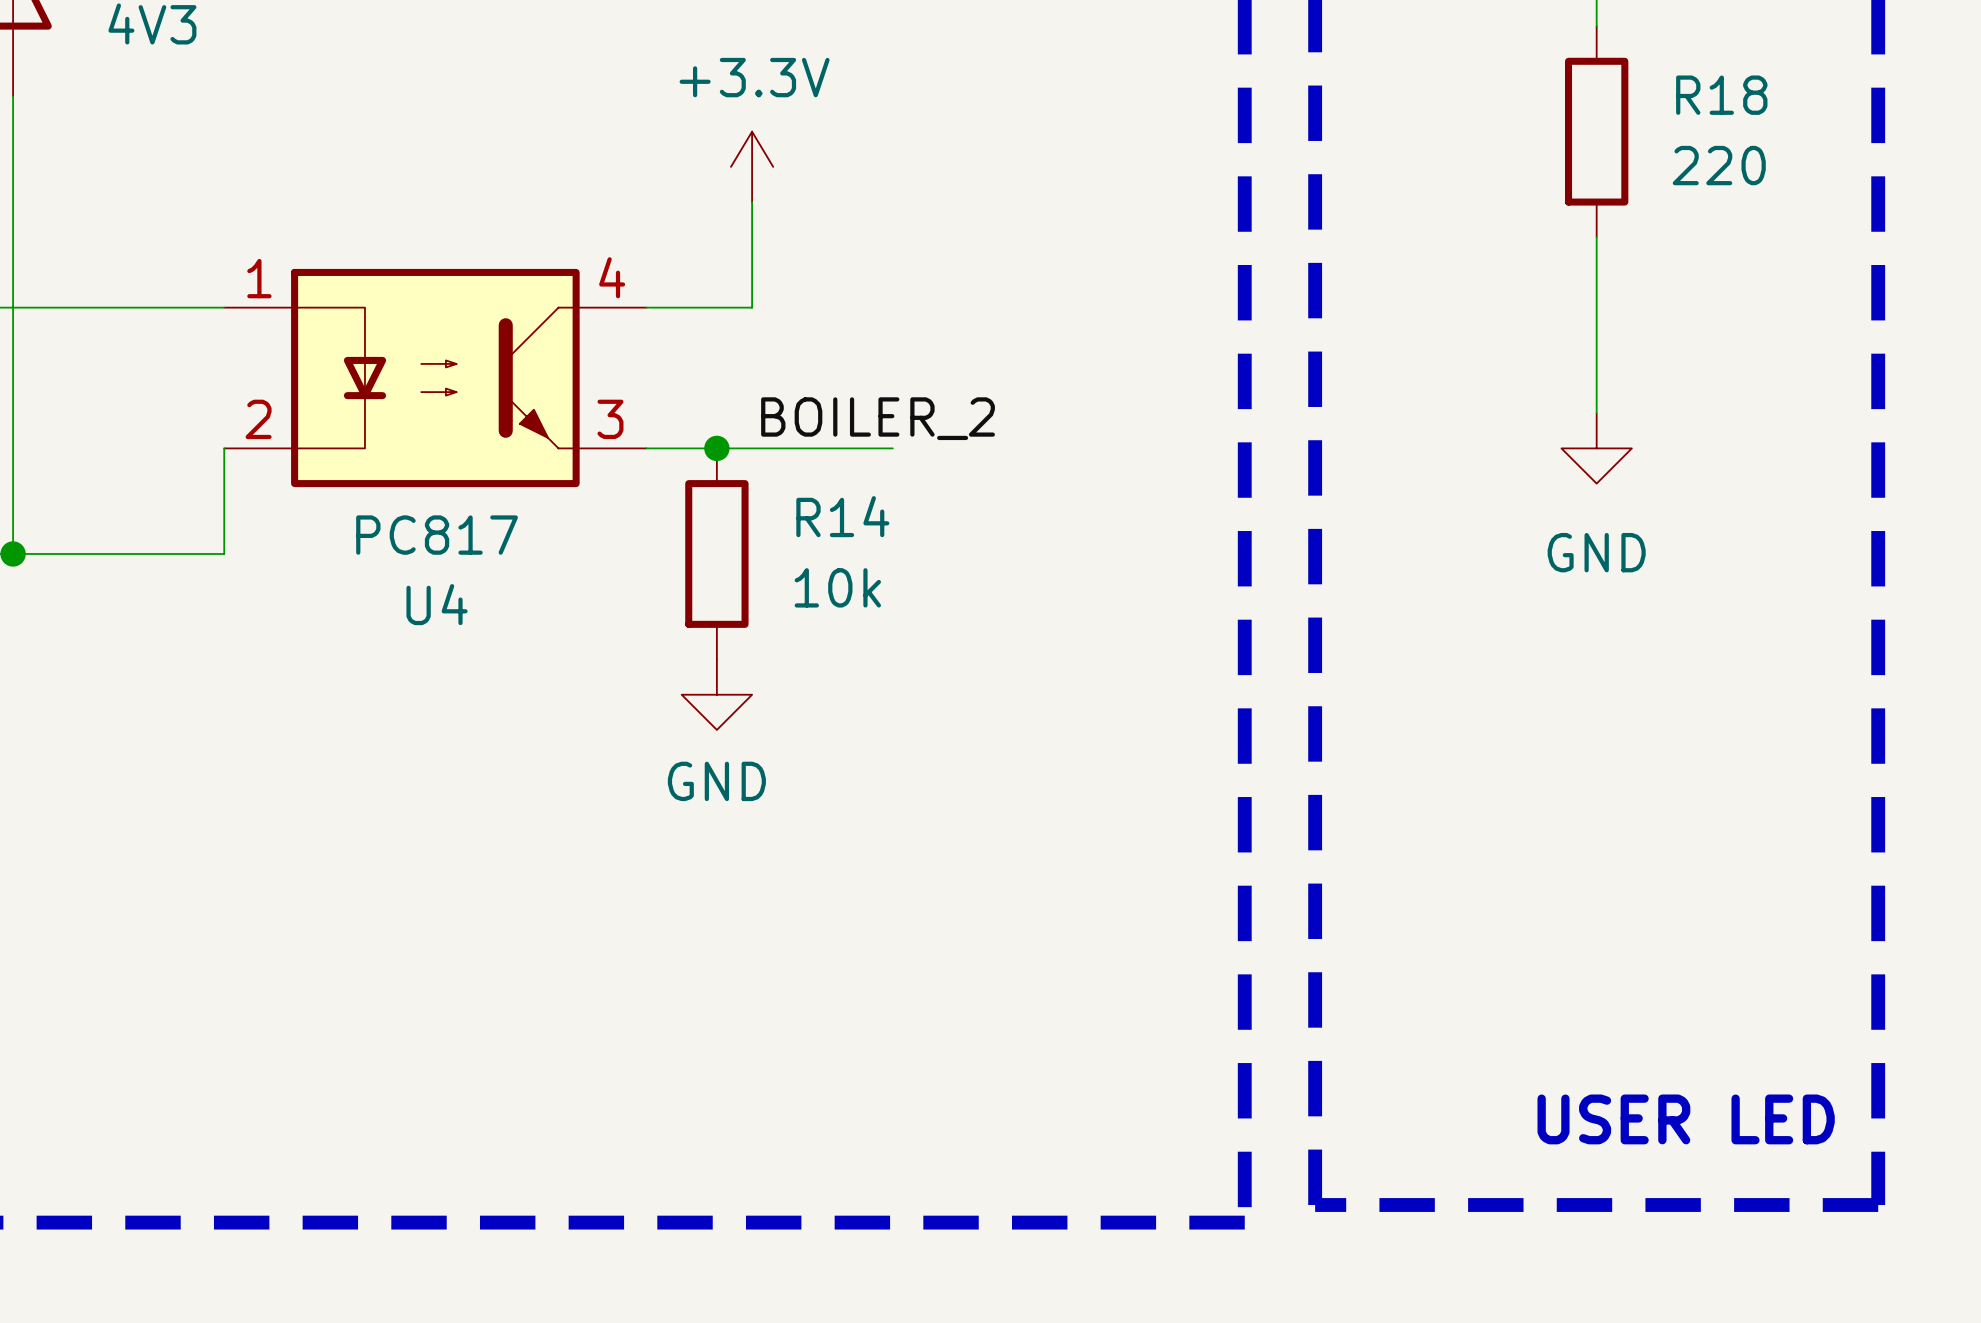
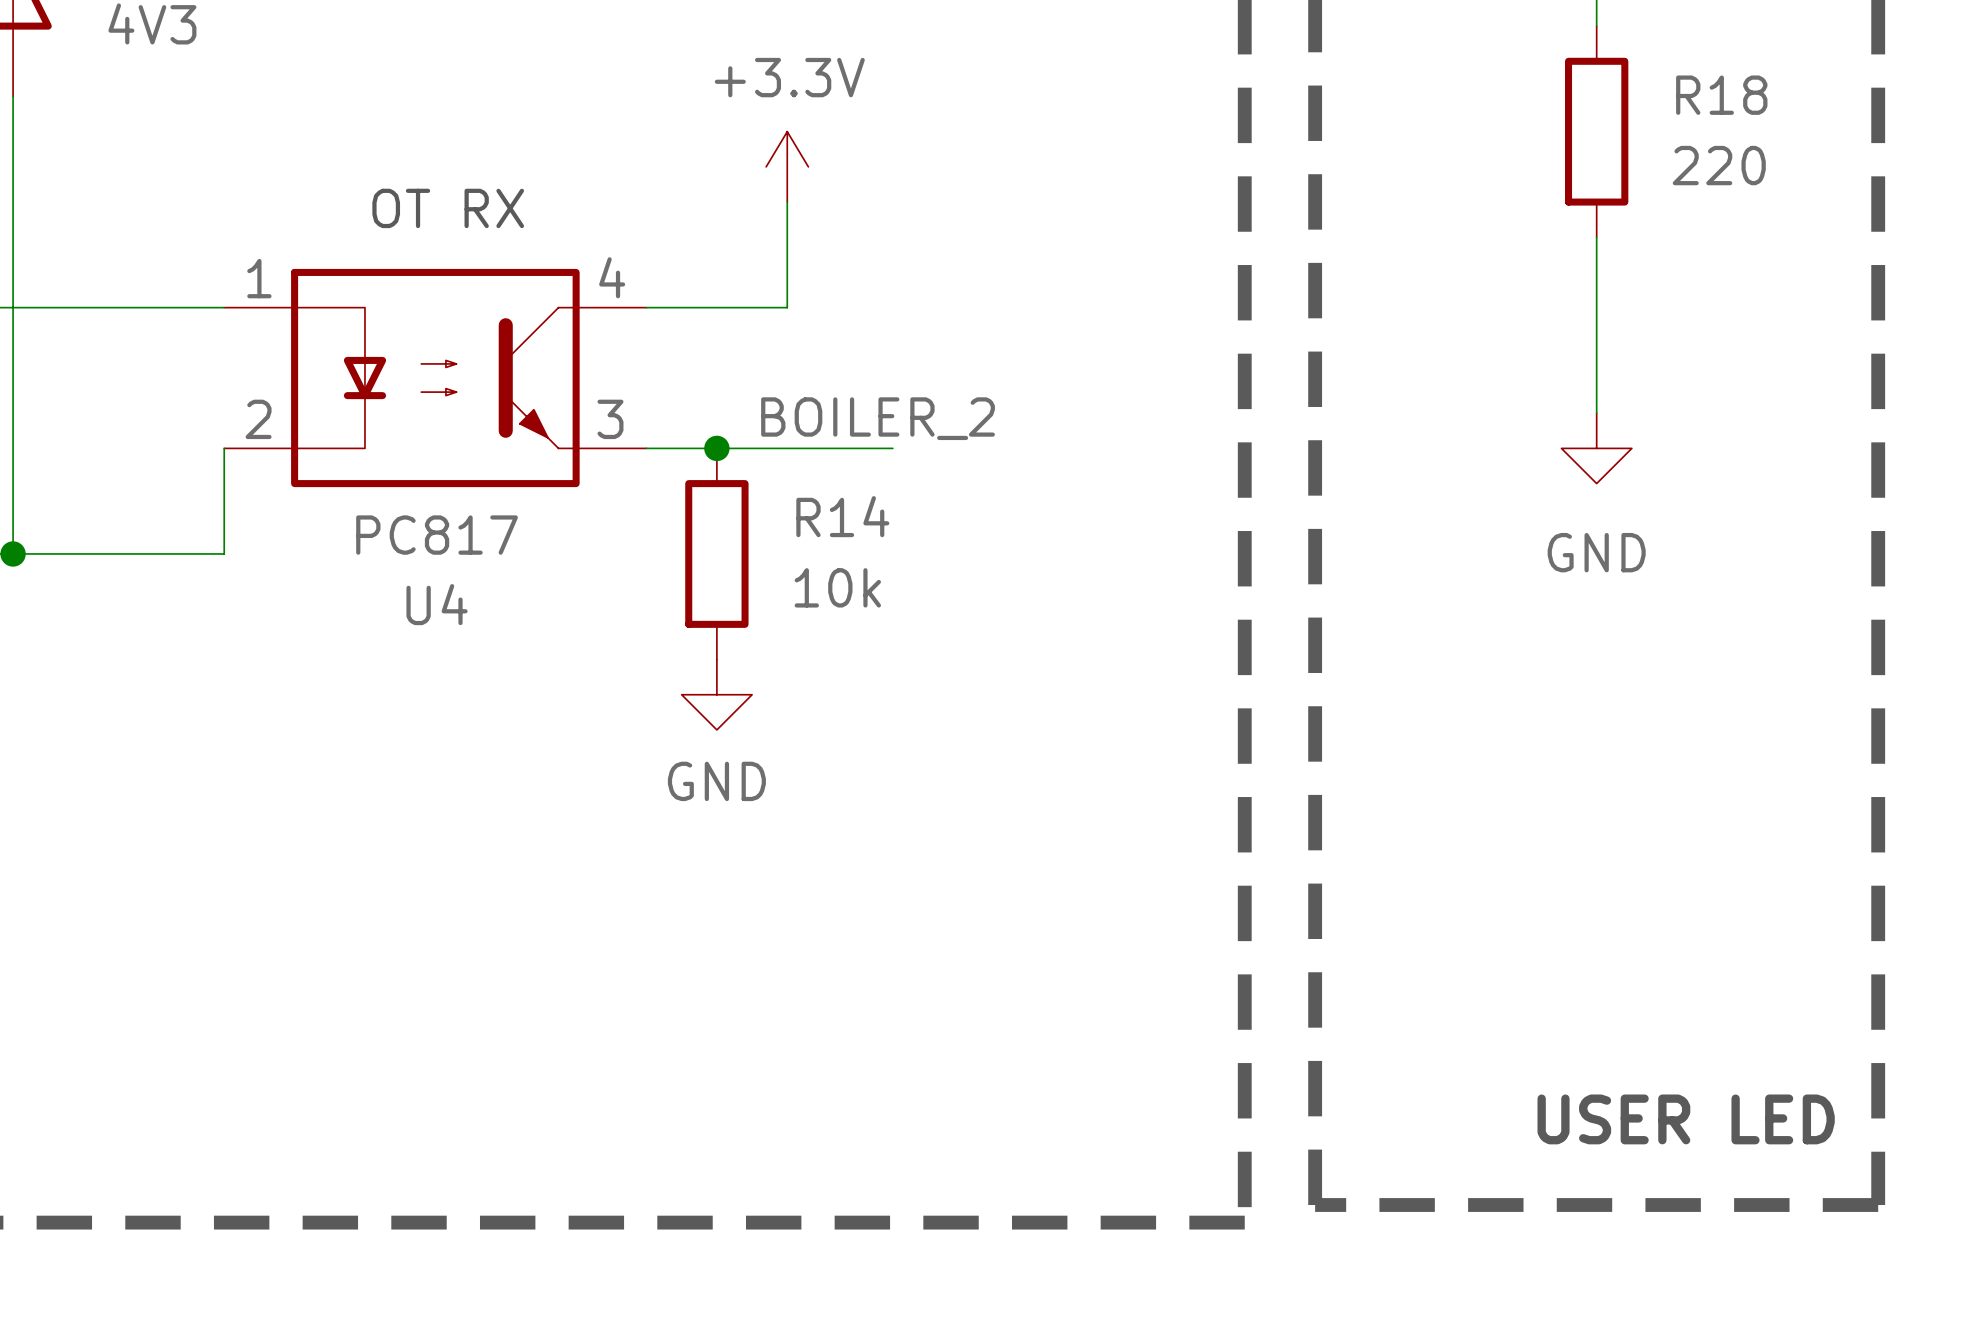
power symbol position: +3.3V (752, 166) -> +3.3V (787, 166)
wire: (752, 202) (752, 307) -> (787, 202) (787, 307) (752, 307)
text: none -> OT RX (448, 208)

